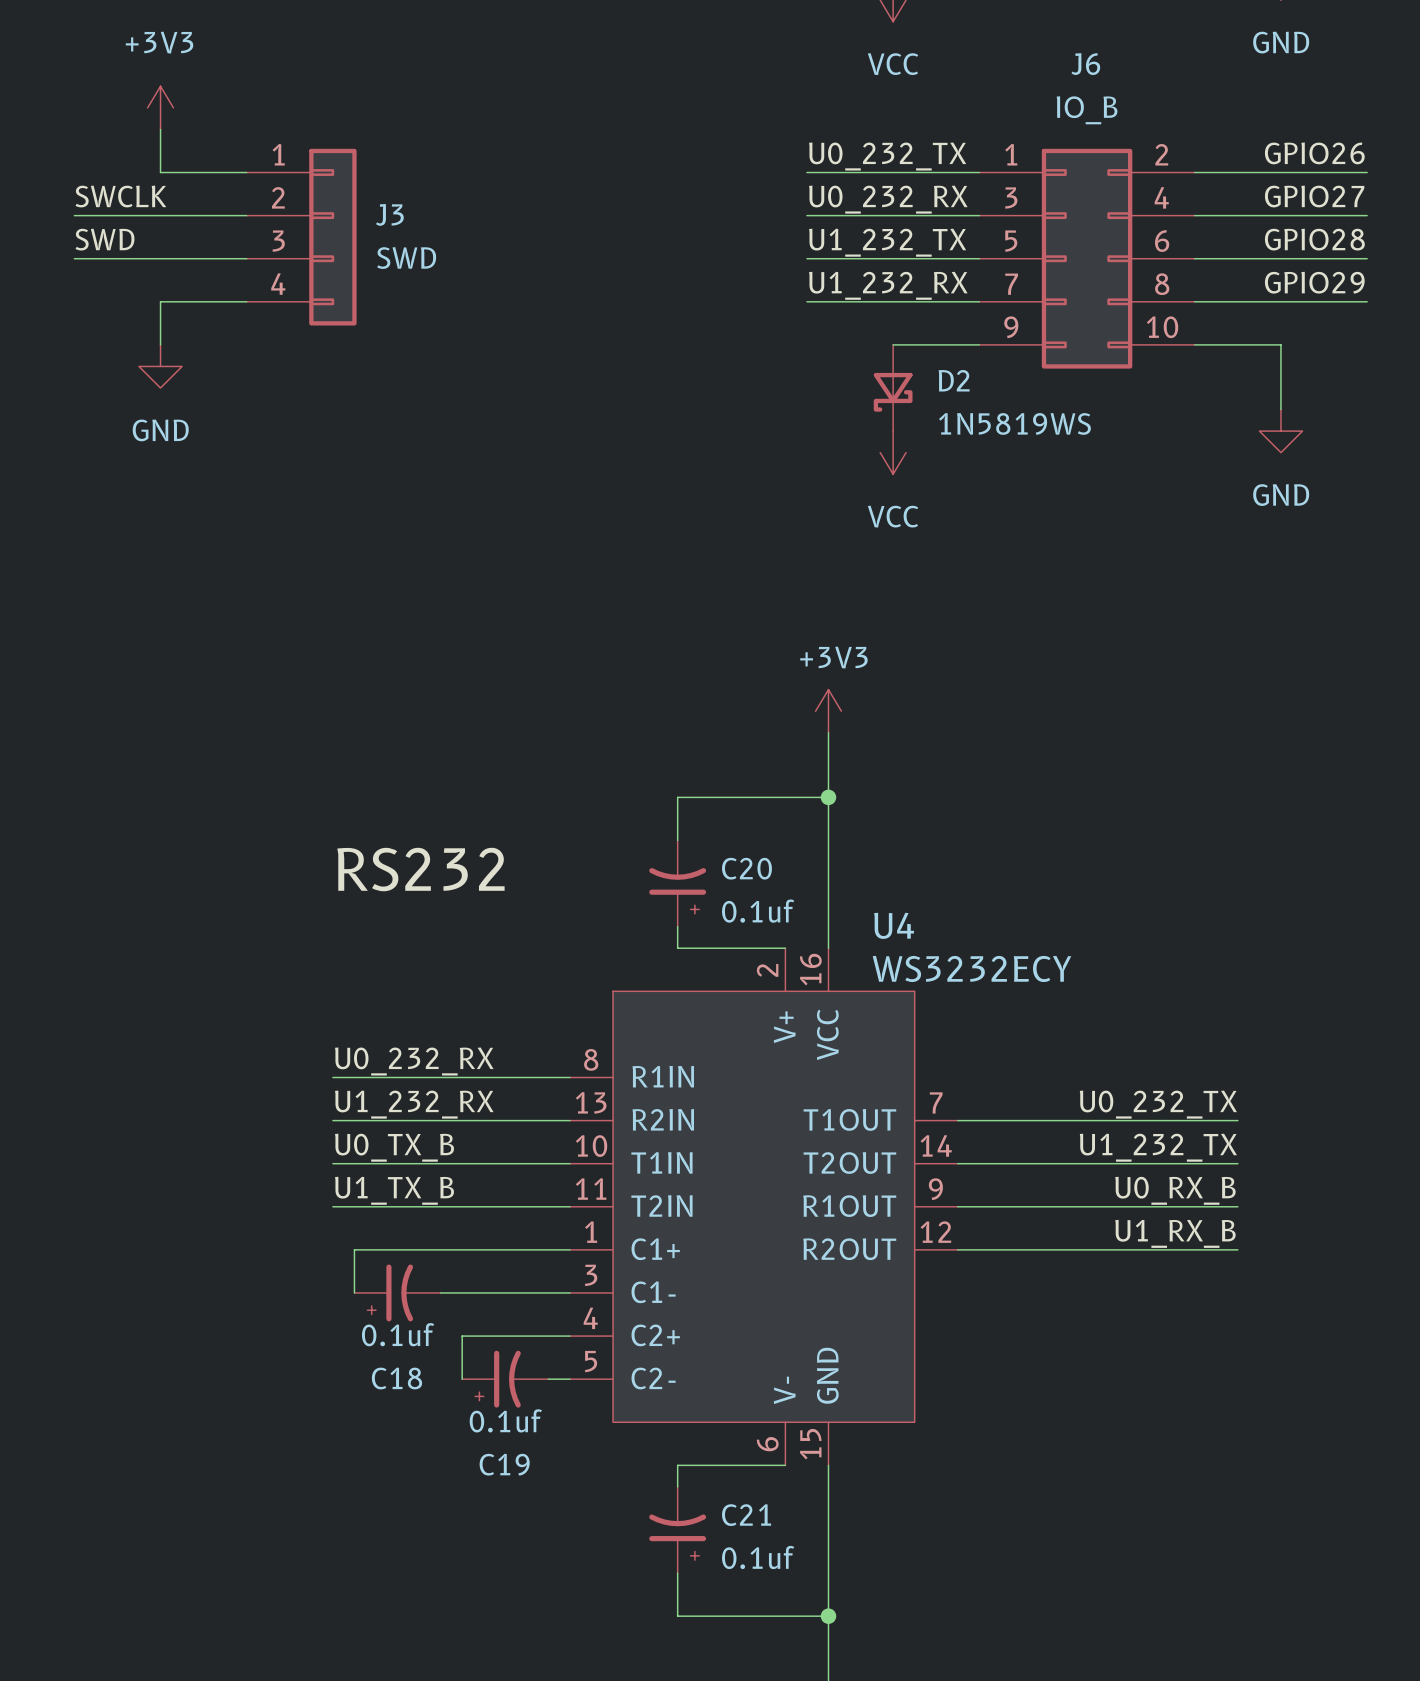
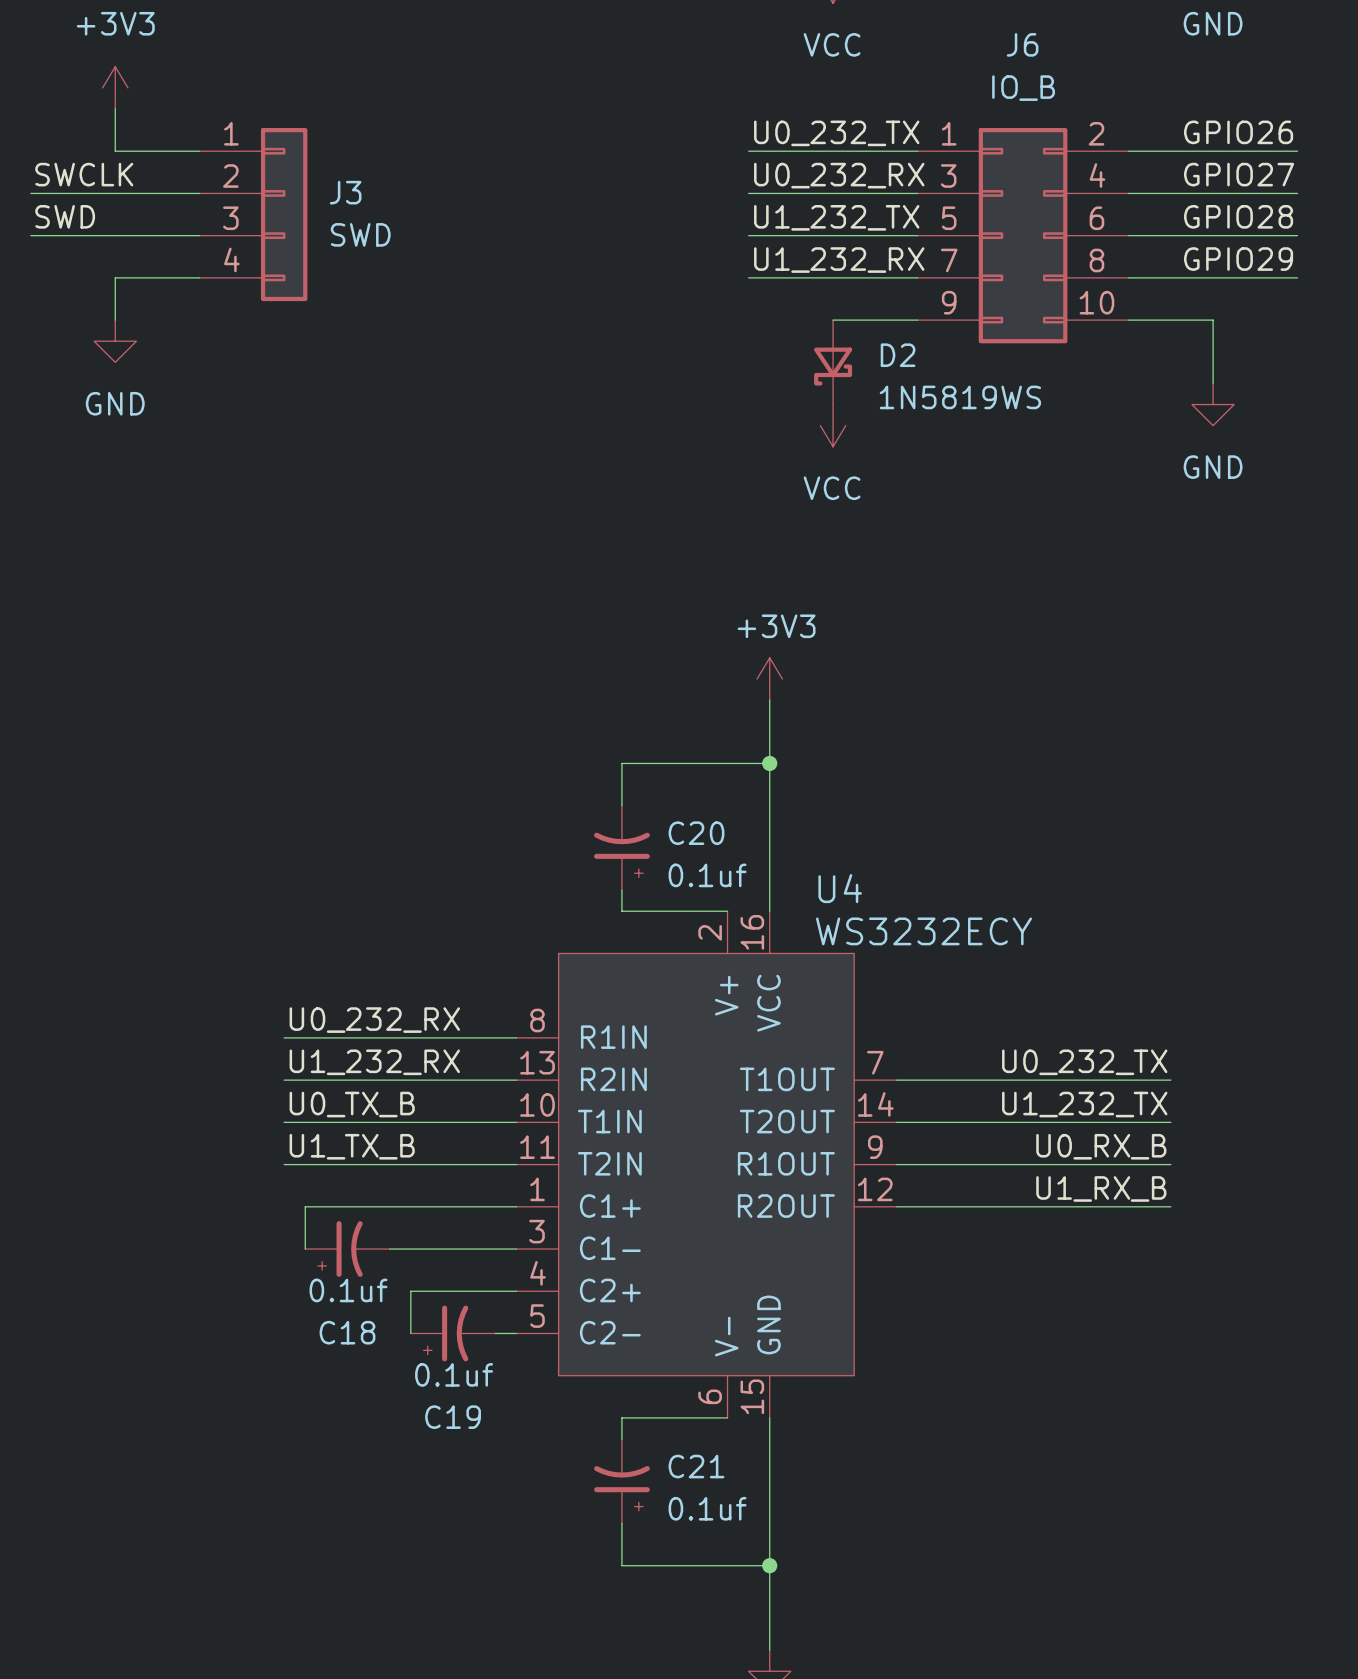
label: RS232 (420, 869) -> none

